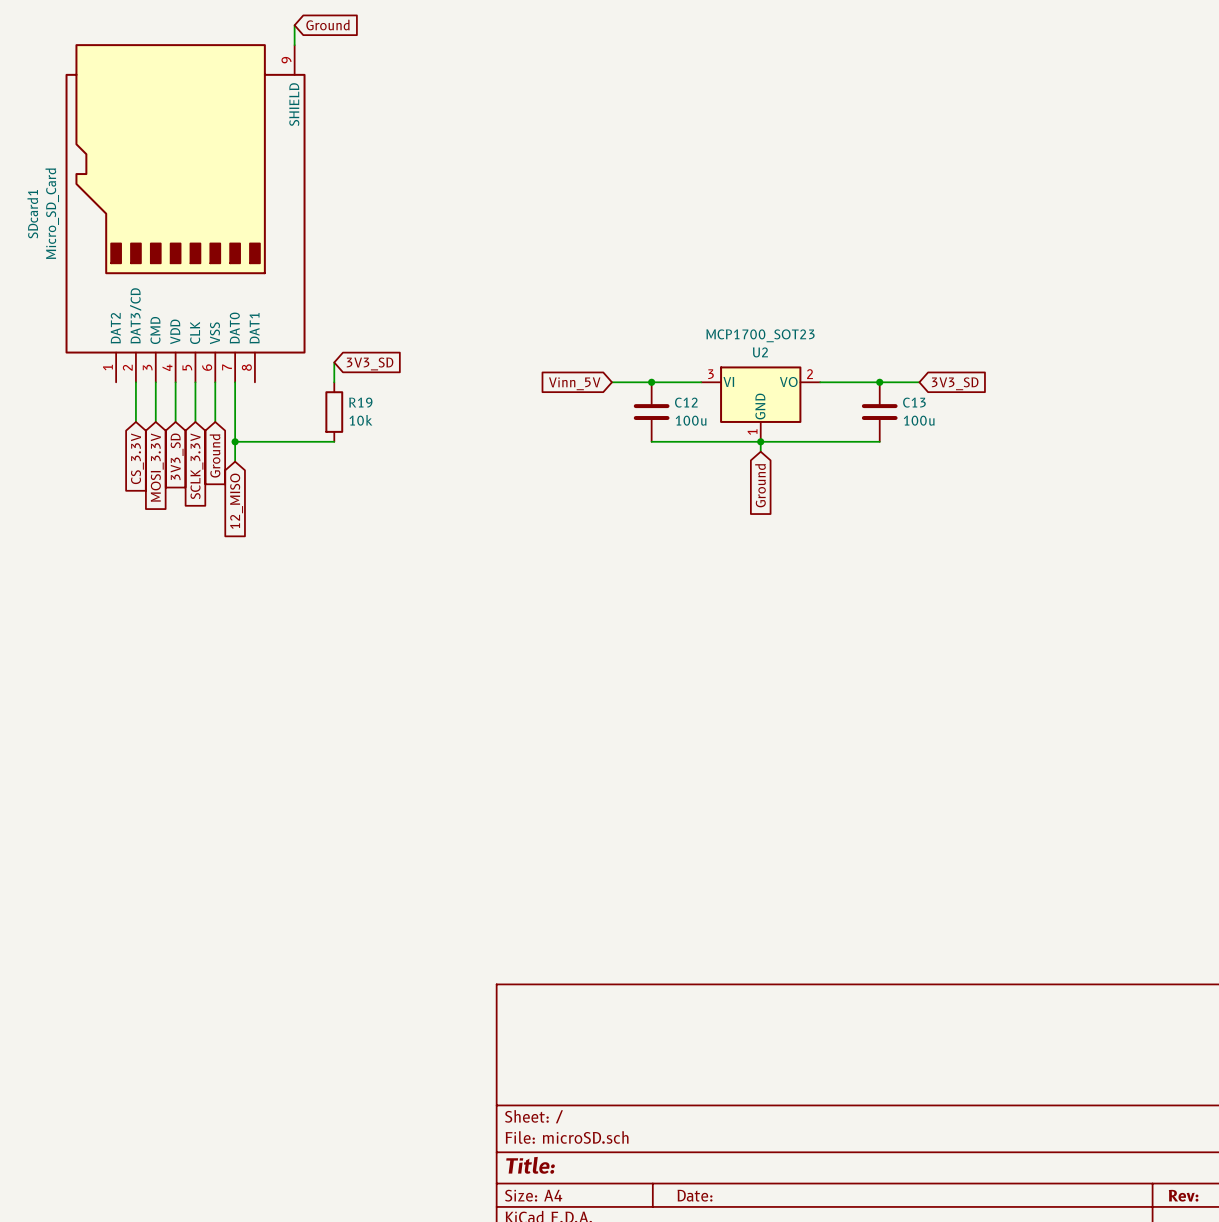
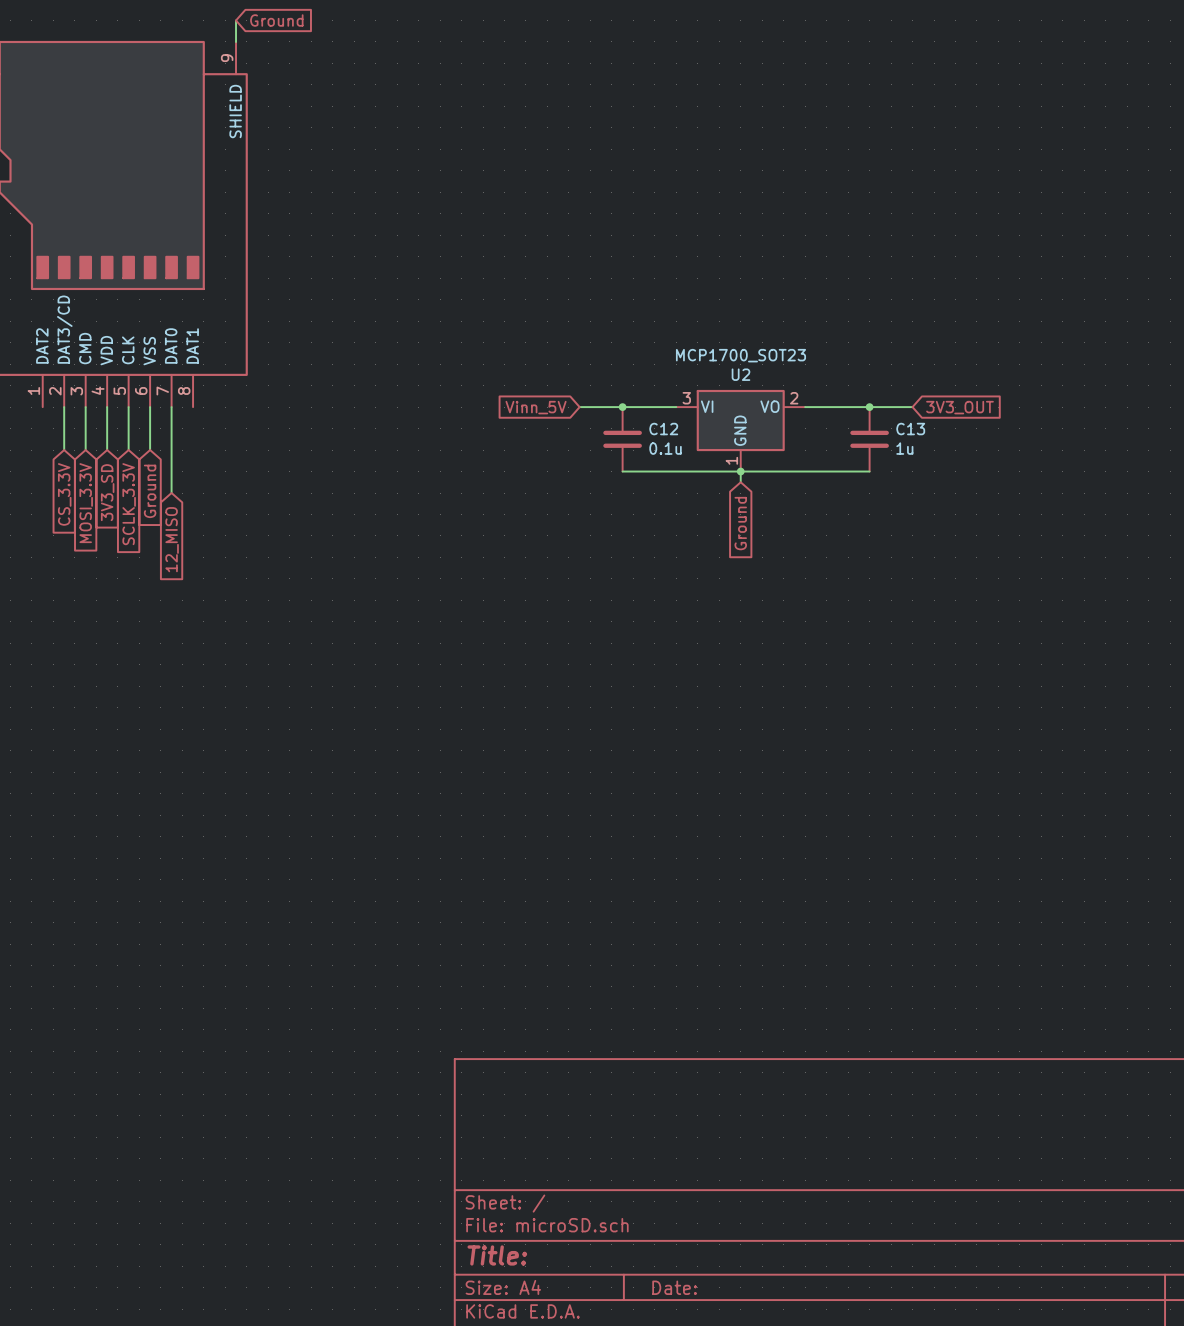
wire: (334, 362) (334, 382) -> none
global label: 3V3_SD (370, 363) -> none
global label: 3V3_SD (955, 383) -> 3V3_OUT (959, 407)
R19: 10k (334, 412) -> none
C12 value: 100u (691, 420) -> 0.1u (665, 448)
C13 value: 100u (919, 420) -> 1u (904, 448)
wire: (235, 441) (334, 441) -> none
junction: (235, 441) -> none

